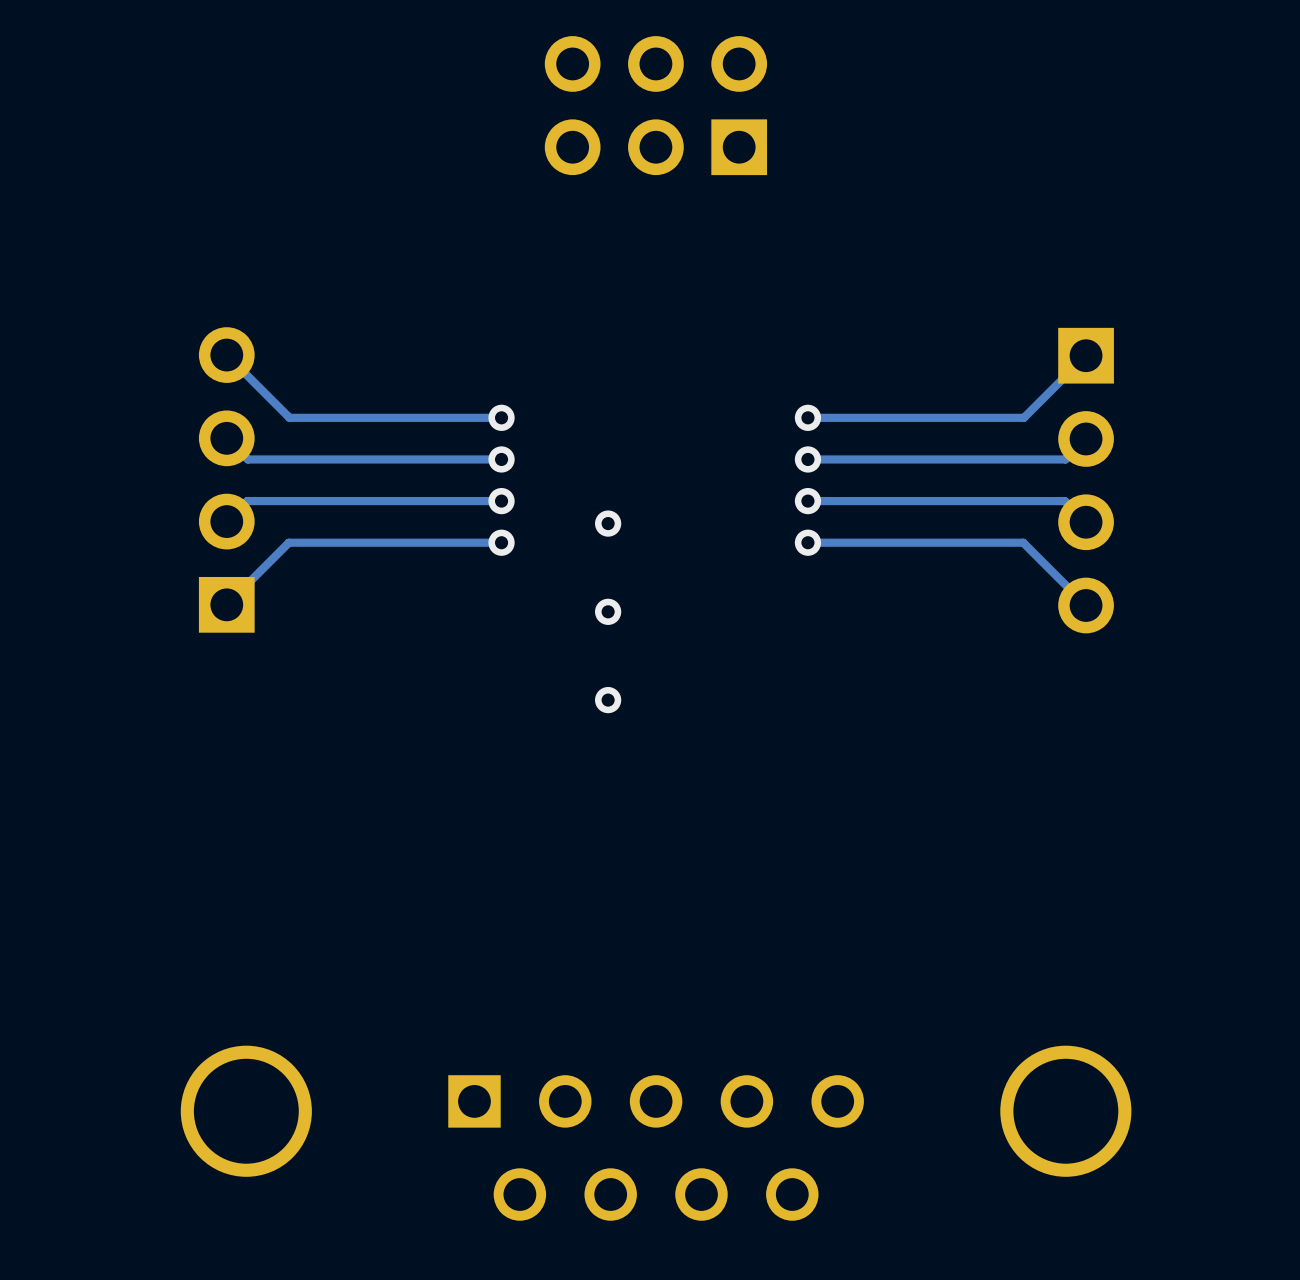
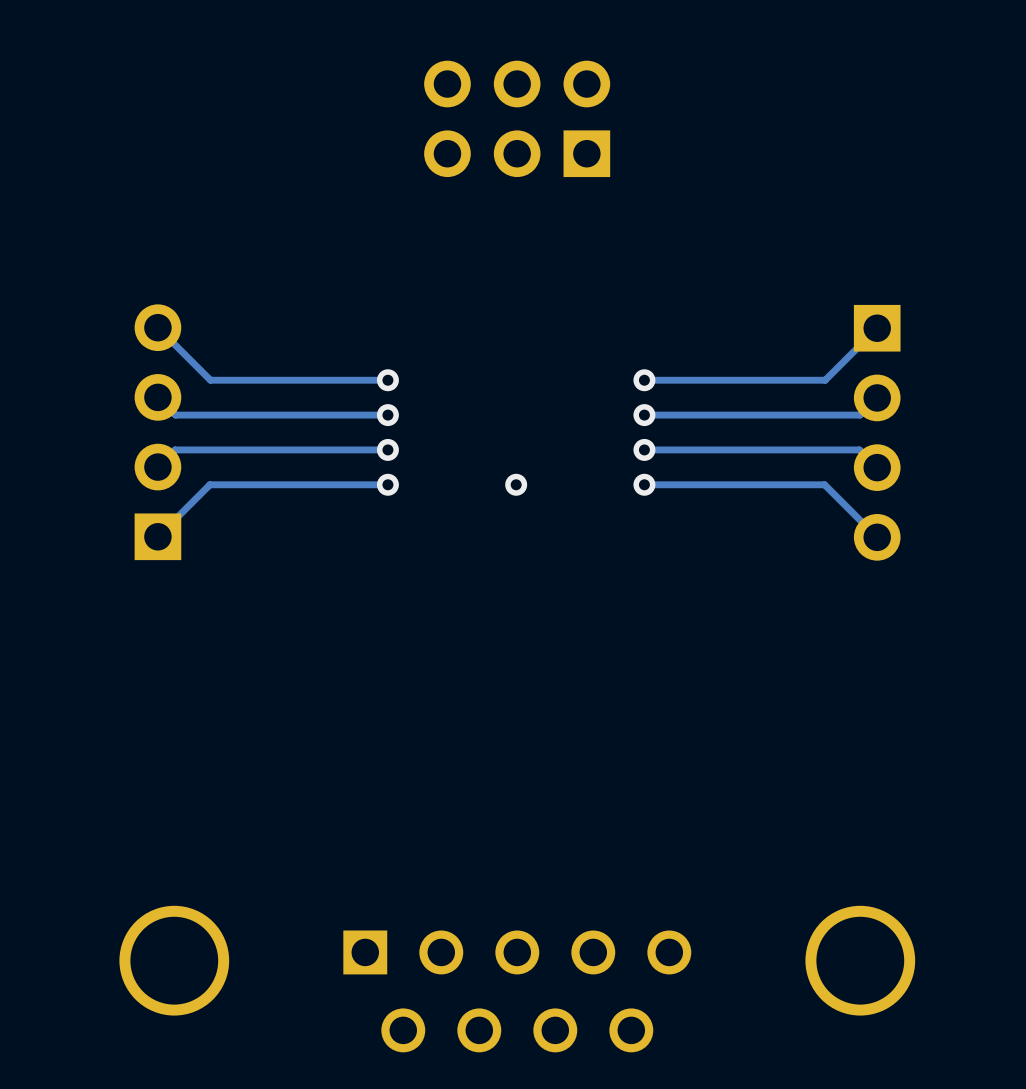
via: (608, 523) -> none
via: none -> (516, 484)
via: (608, 611) -> none
via: (608, 700) -> none

